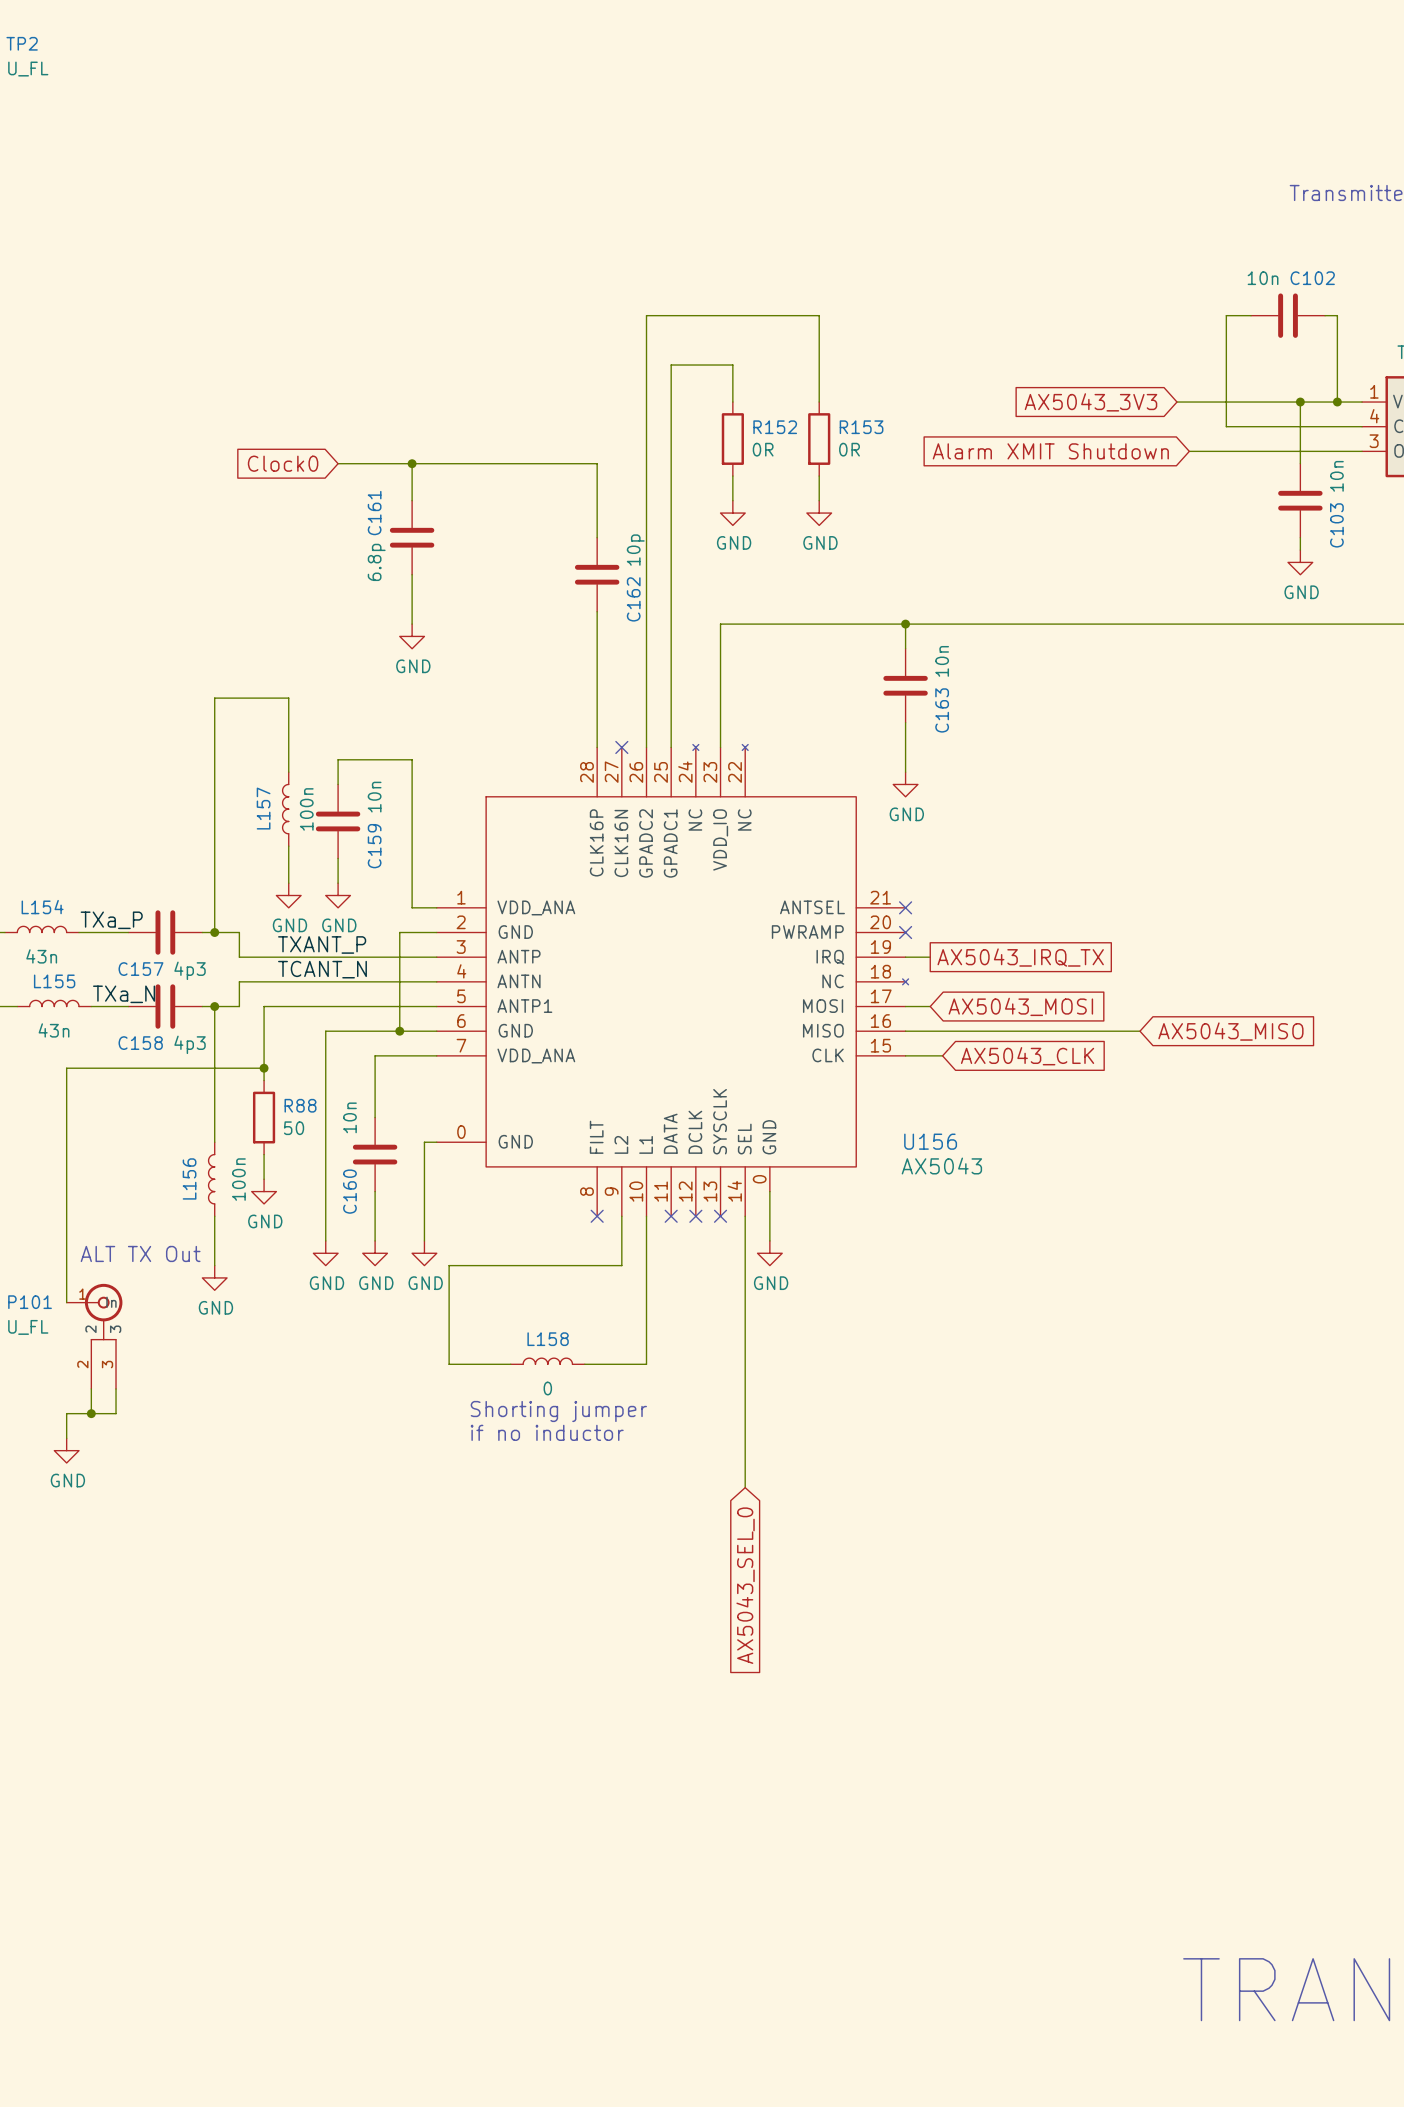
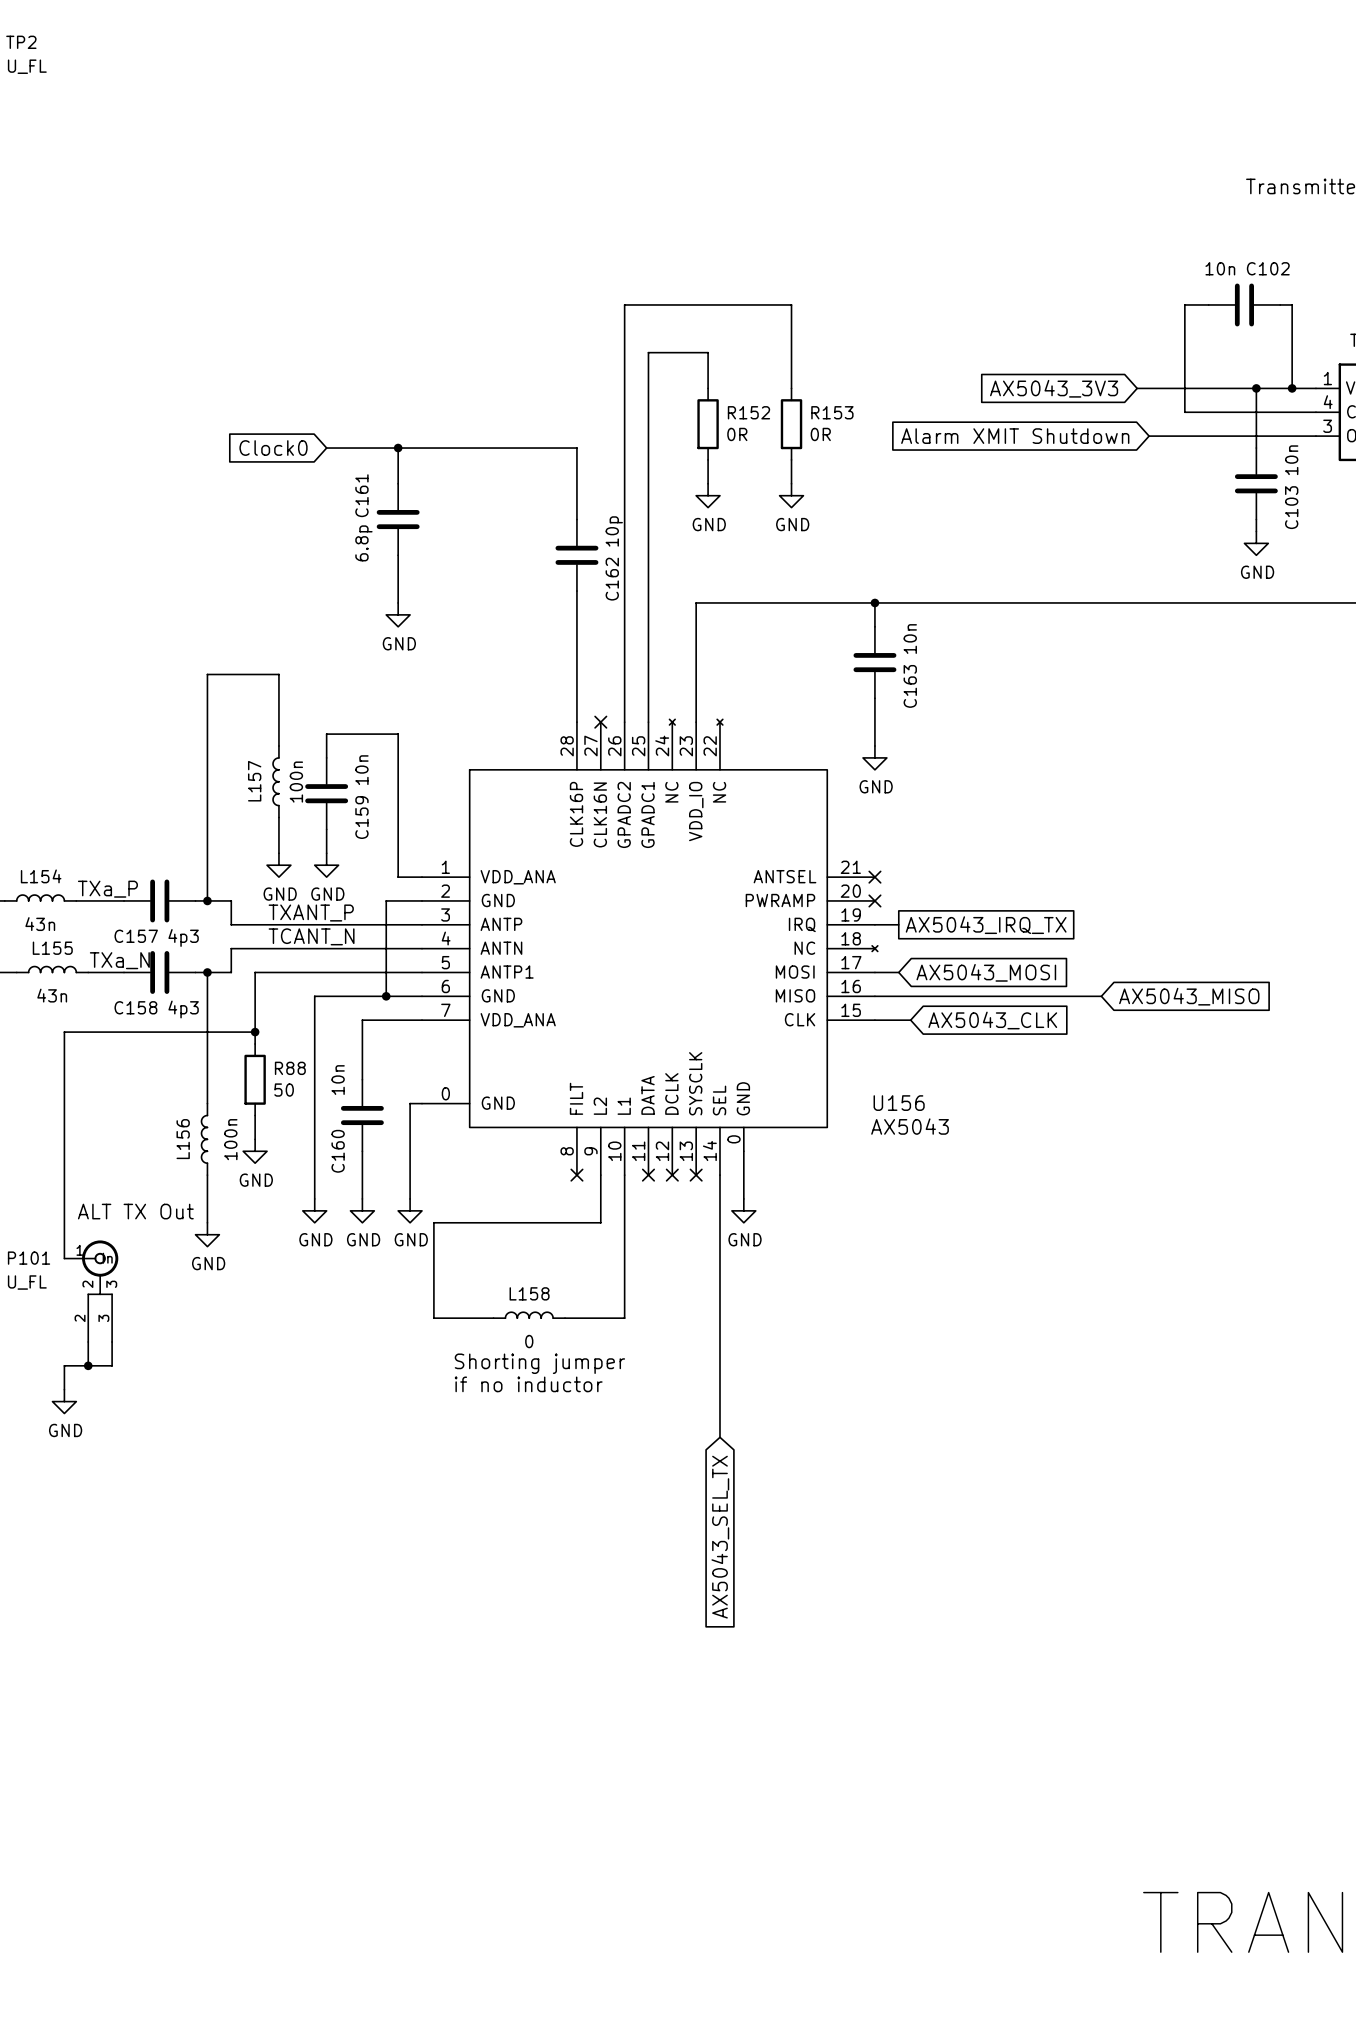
global label: AX5043_SEL_0 (745, 1585) -> AX5043_SEL_TX (720, 1537)

